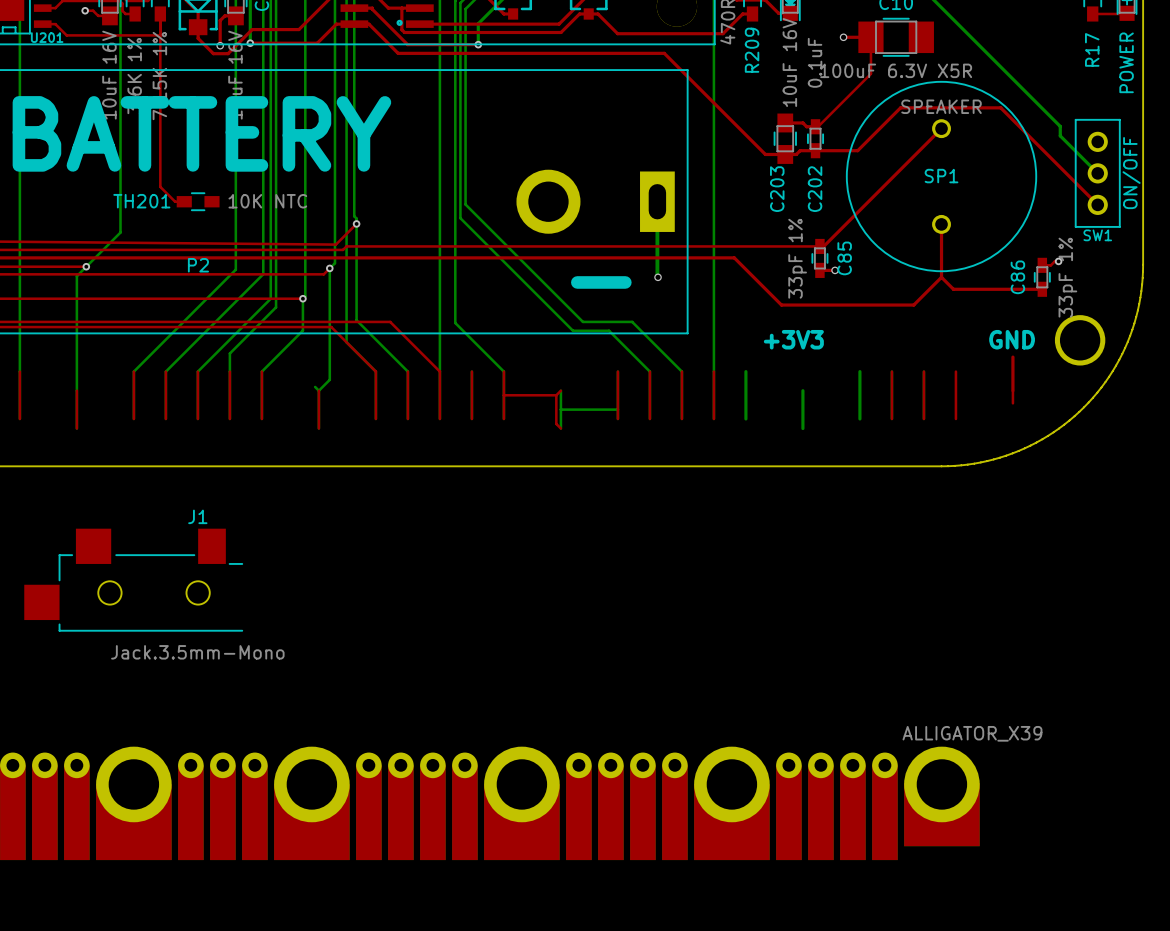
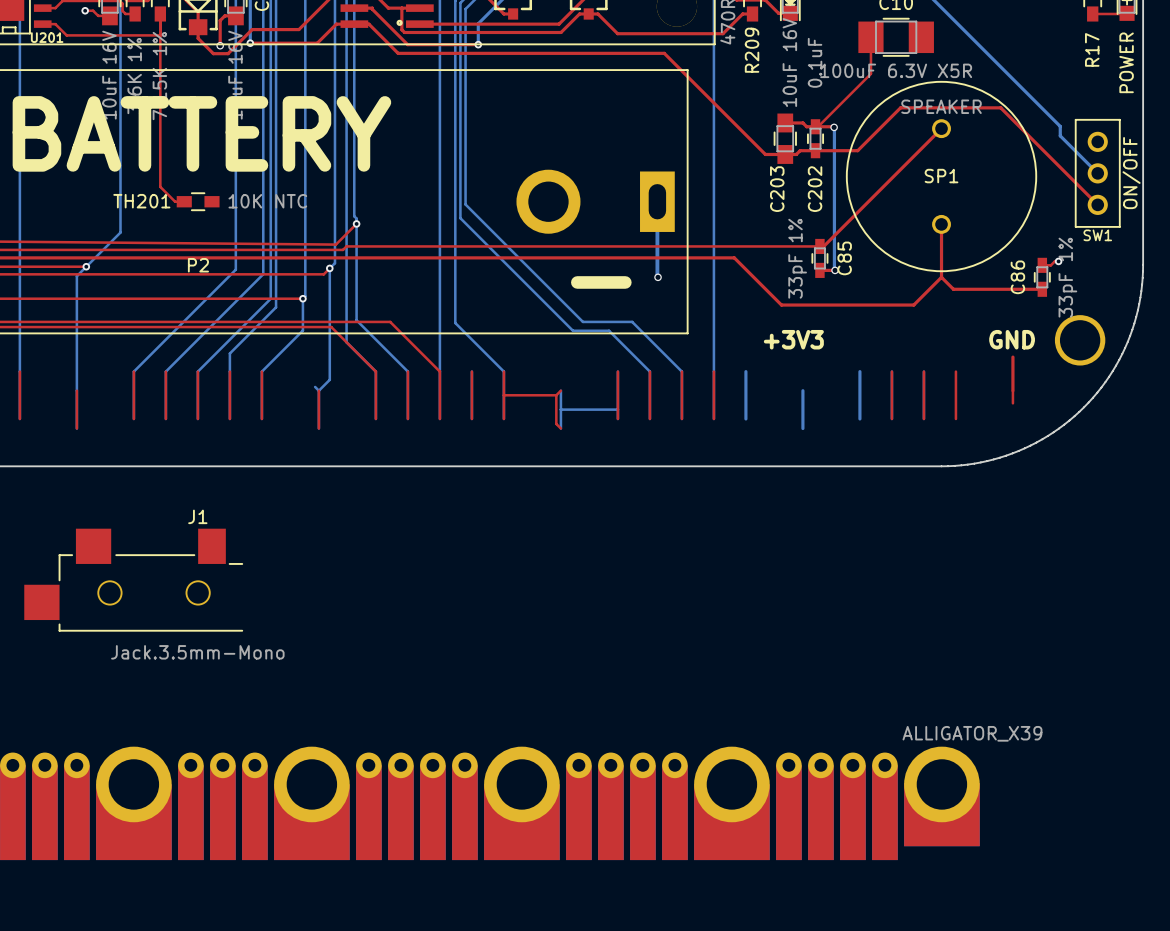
top track: (843, 37) (870, 37) -> none
via: (843, 37) -> none
top track: none -> (815, 126) (834, 127)
bottom track: none -> (834, 127) (834, 270)
via: none -> (834, 127)

